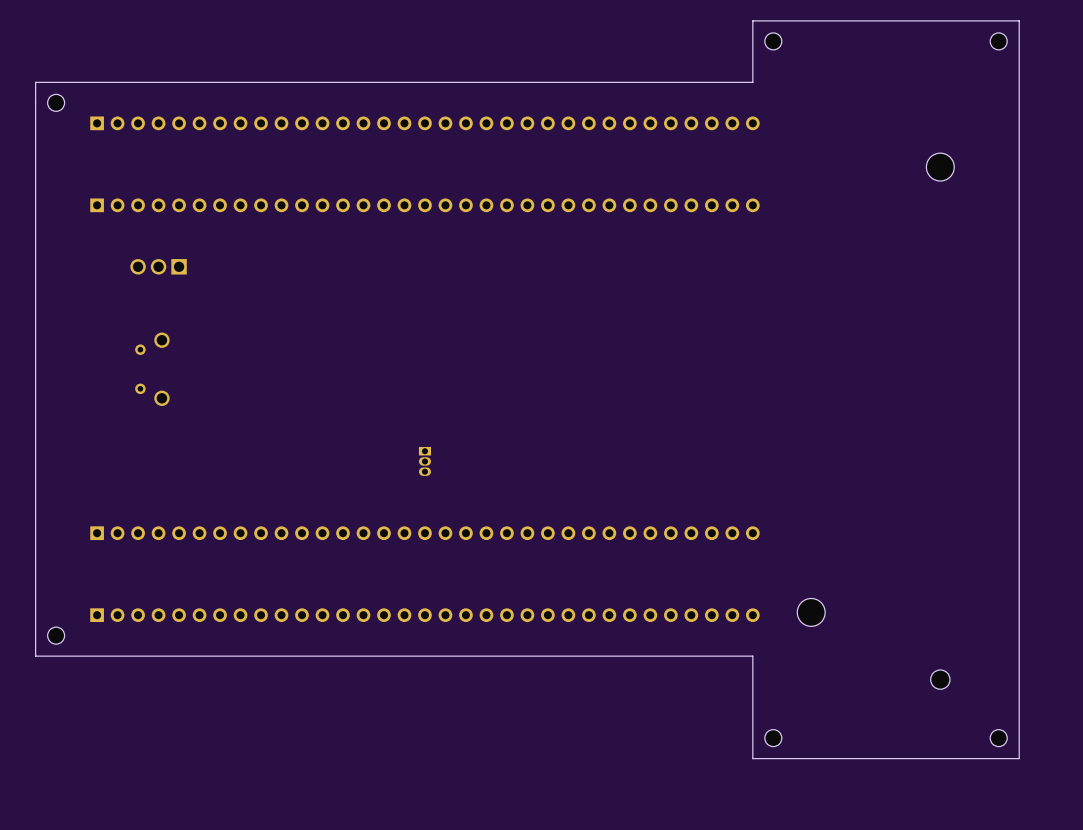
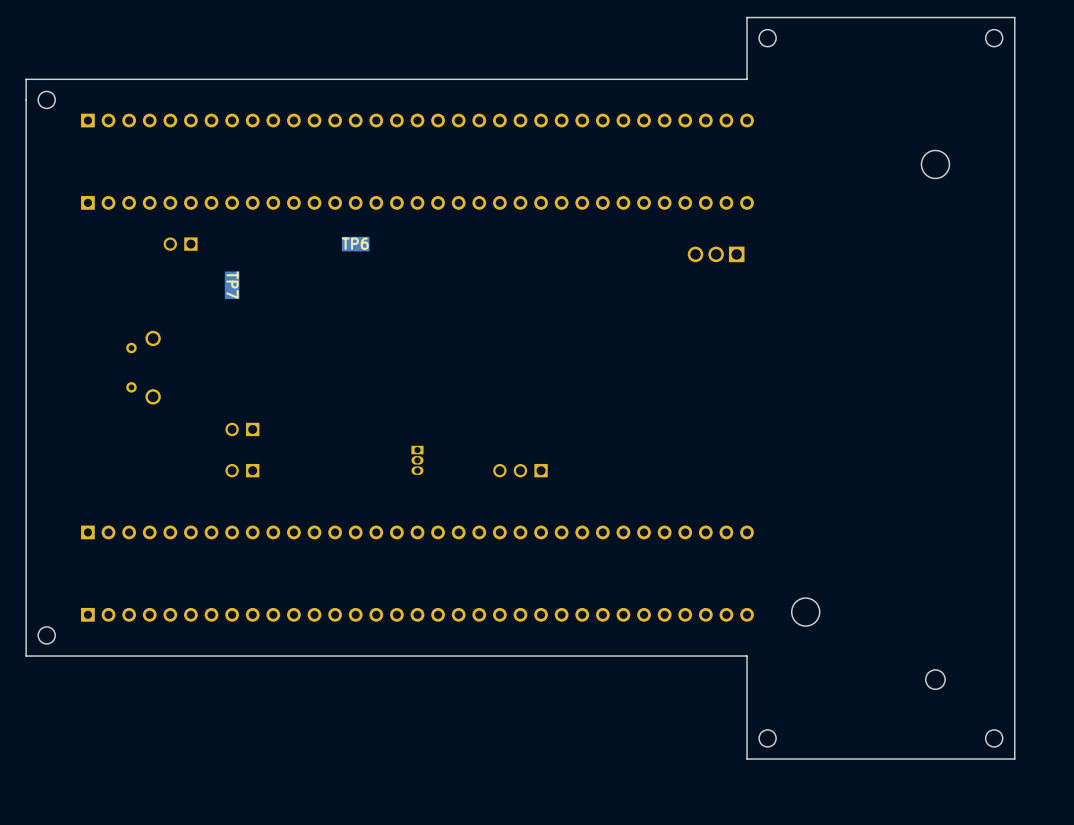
part: none -> (180, 244)
TP6: none -> (355, 244)
part: none -> (716, 254)
part: (158, 266) -> none
TP7: none -> (232, 285)
part: none -> (242, 429)
part: none -> (242, 470)
part: none -> (520, 470)

